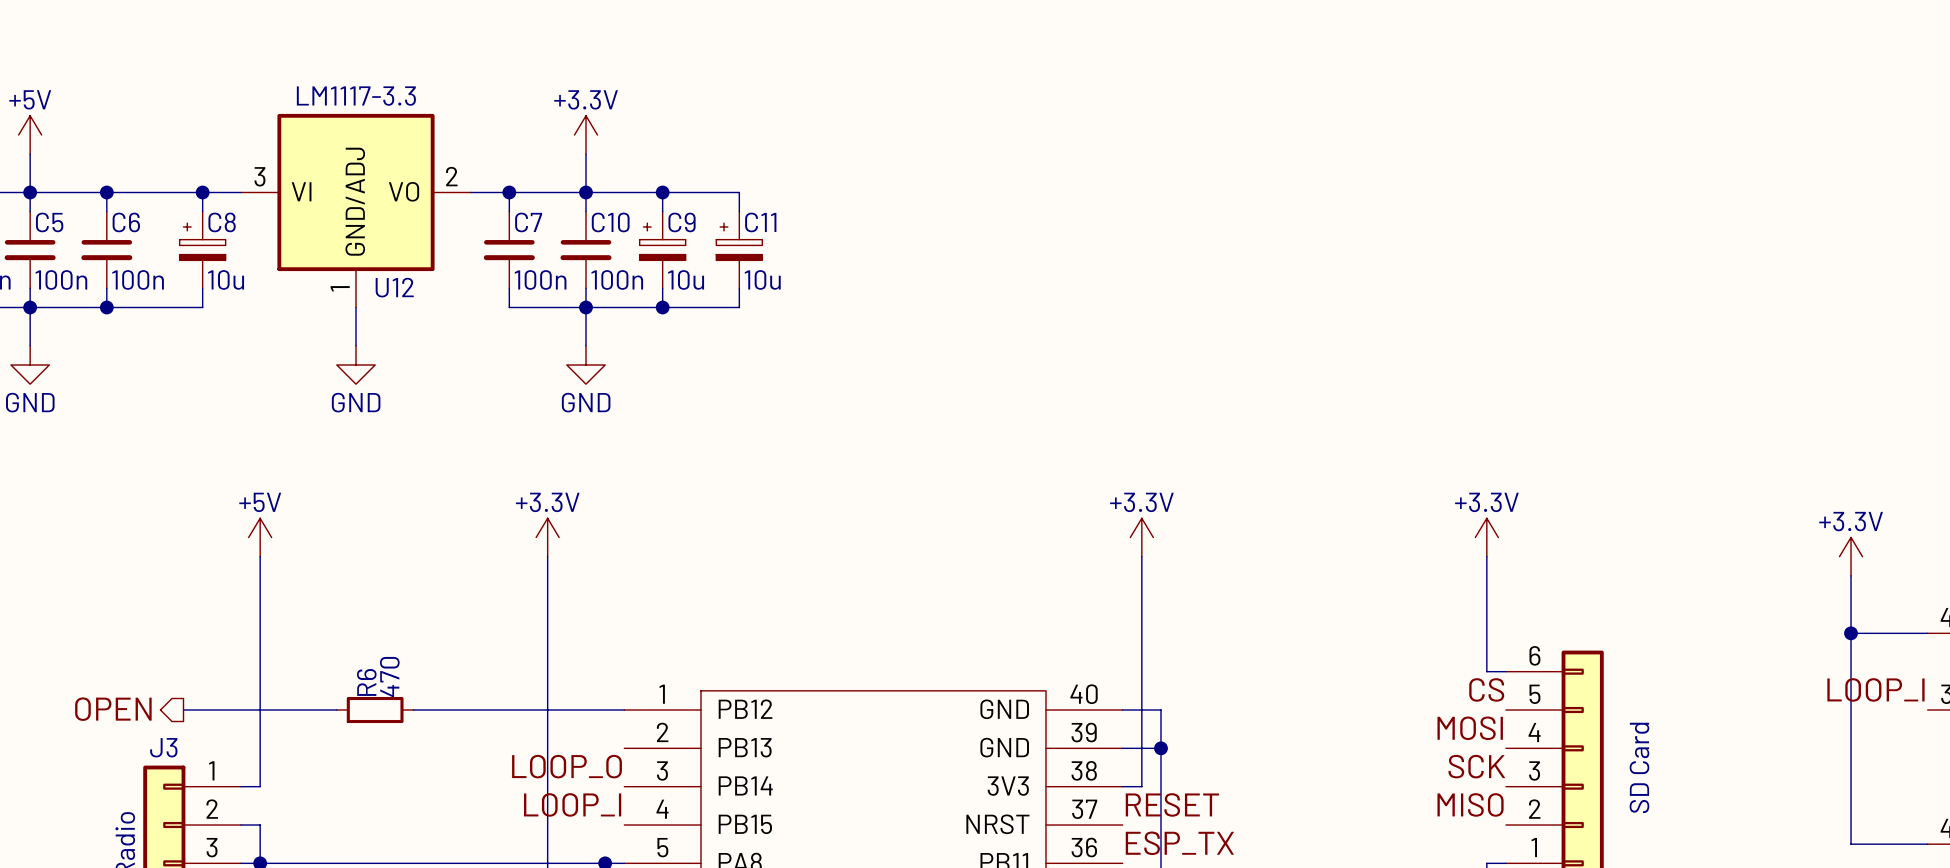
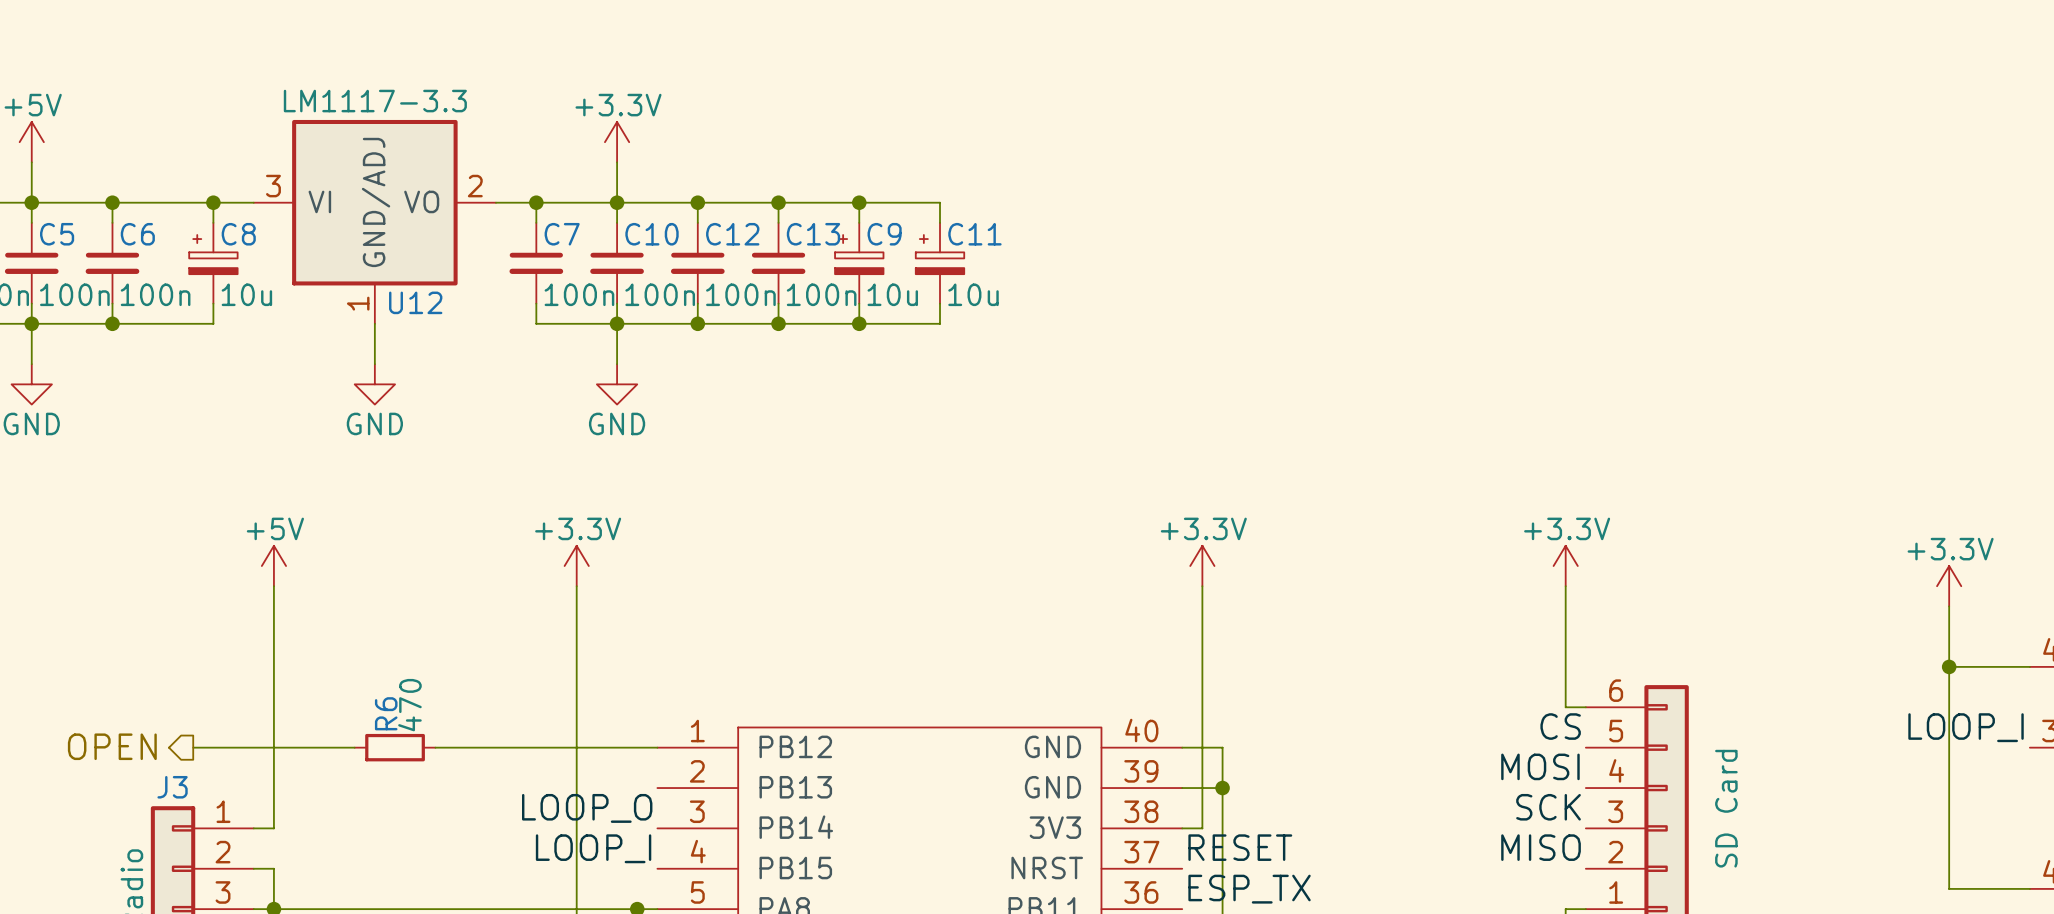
wire: none -> (778, 202) (940, 202) (940, 222)
junction: none -> (778, 202)
wire: none -> (859, 202) (859, 222)
junction: none -> (859, 202)
C9 position: (662, 250) -> (859, 263)
C12: none -> 100n (697, 263)
C11 position: (739, 250) -> (940, 263)
C13: none -> 100n (778, 263)
wire: none -> (859, 303) (859, 323)
wire: none -> (940, 303) (940, 323) (778, 323)
junction: none -> (778, 323)
junction: none -> (859, 323)

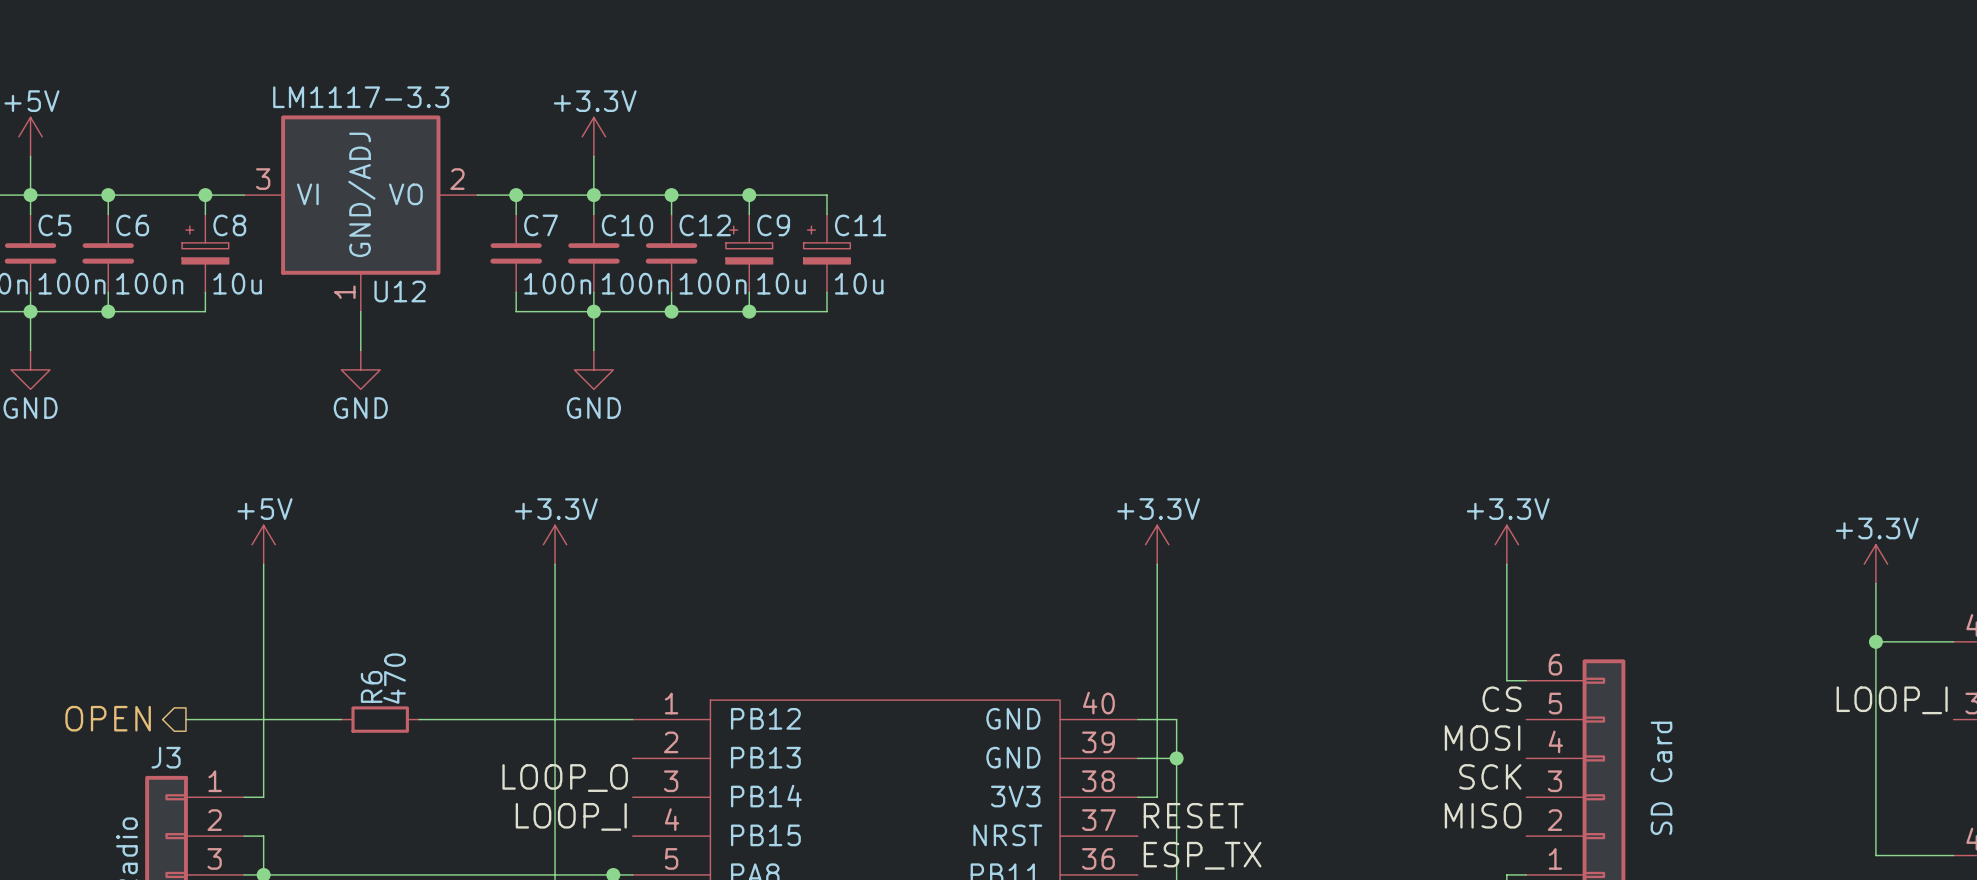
wire: (859, 202) (940, 202) (940, 222) -> none
junction: (859, 202) -> none
C9 name: C9 (884, 234) -> C11 (860, 225)
C13: 100n (778, 263) -> none
C9: none -> 10u (749, 253)
C11: 10u (940, 263) -> none
wire: (940, 303) (940, 323) (859, 323) -> none
junction: (859, 323) -> none

